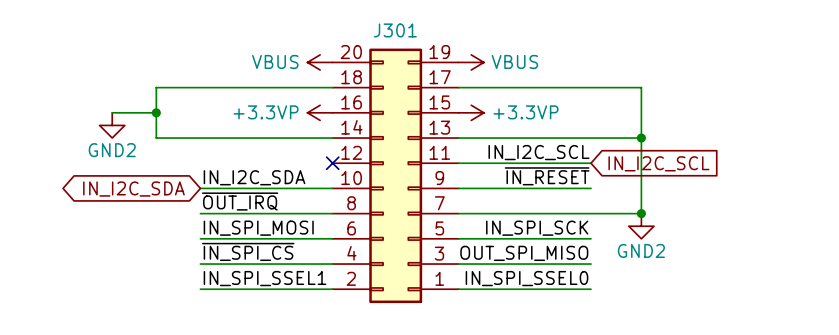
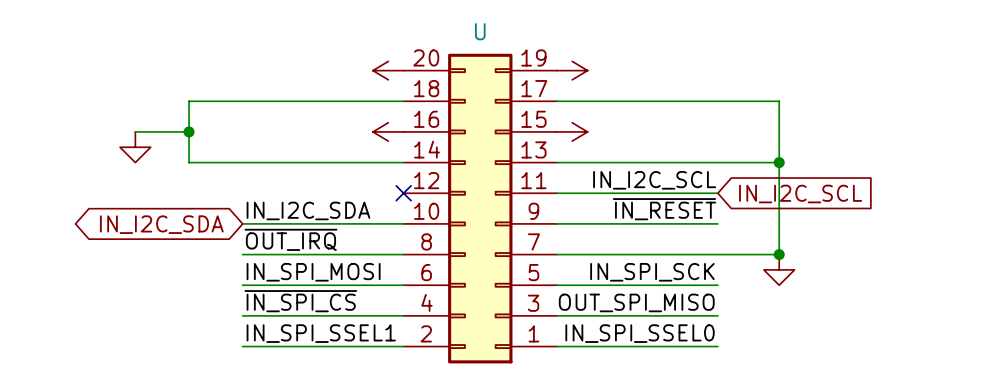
J301 name: J301 (395, 30) -> U (480, 31)
power symbol text: VBUS (275, 61) -> none
power symbol text: VBUS (514, 61) -> none
power symbol text: +3.3VP (266, 112) -> none
power symbol text: +3.3VP (525, 112) -> none
power symbol text: GND2 (112, 150) -> none
power symbol text: GND2 (641, 250) -> none

